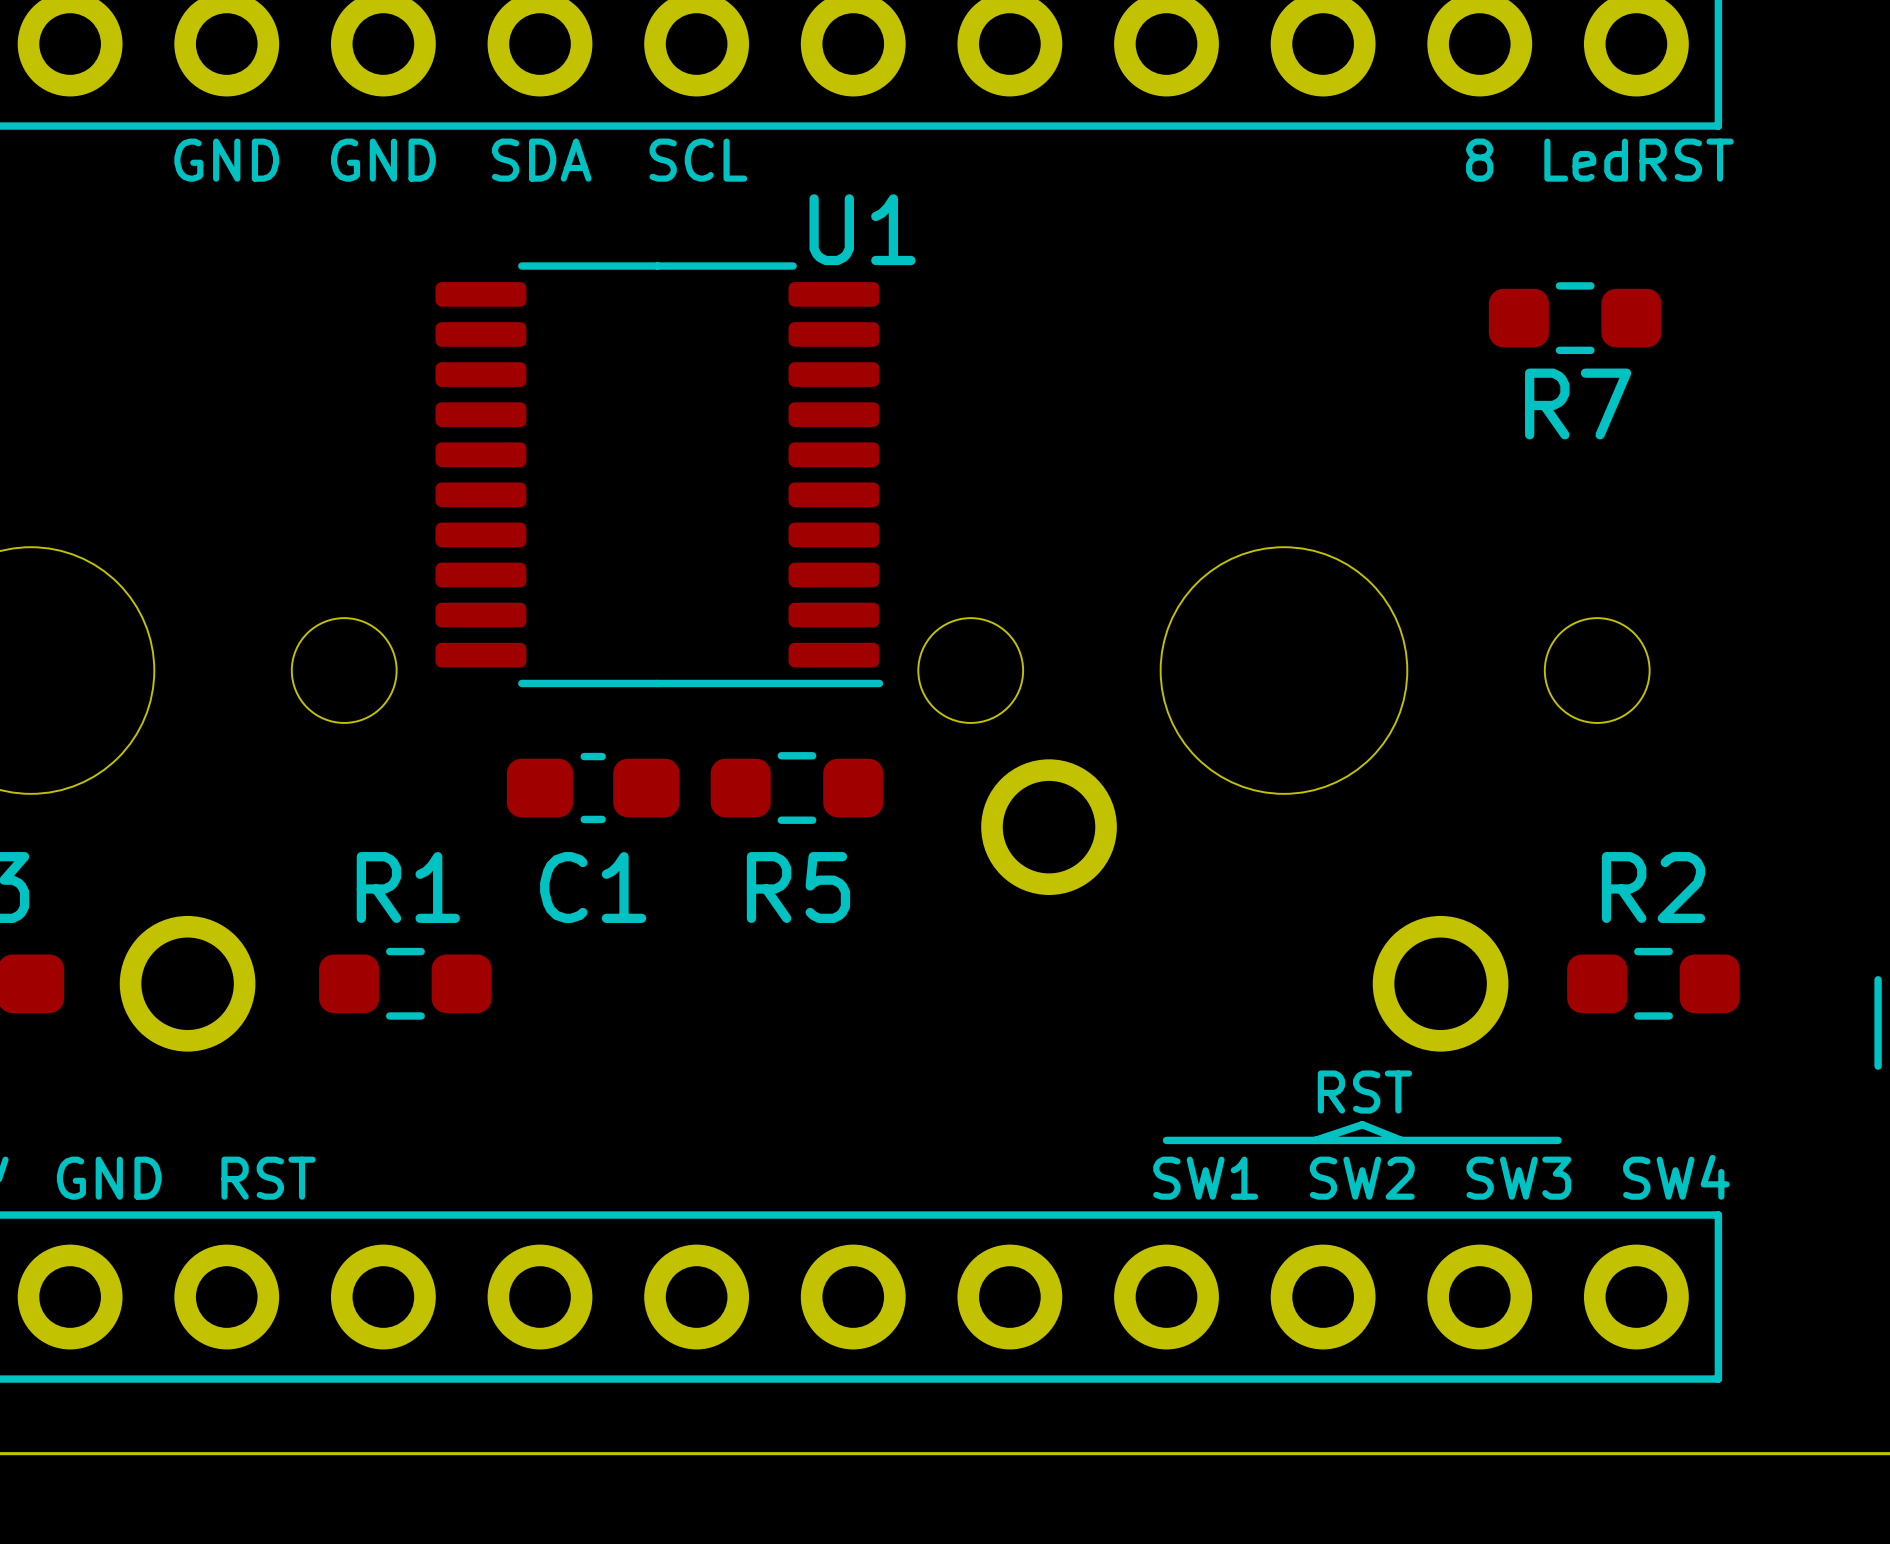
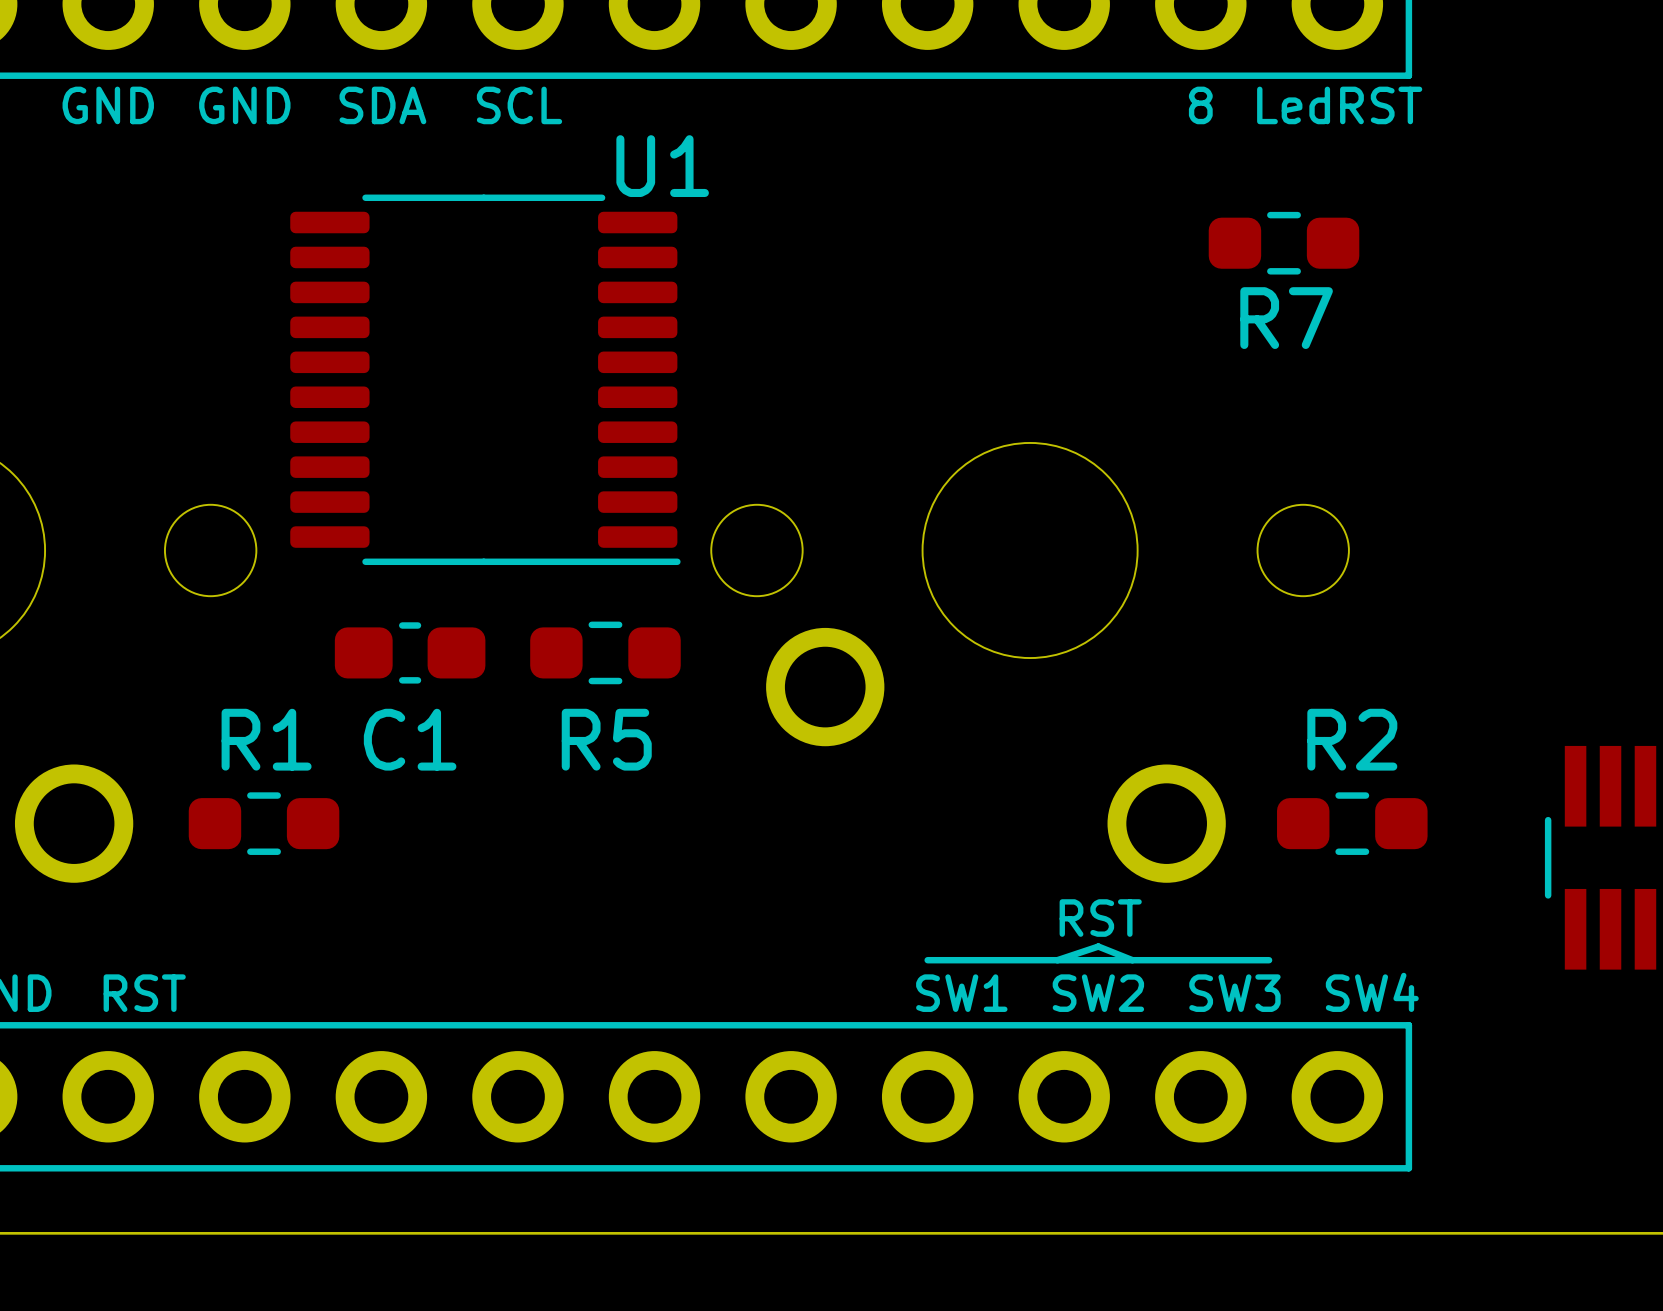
C1 position: (593, 788) -> (410, 652)

